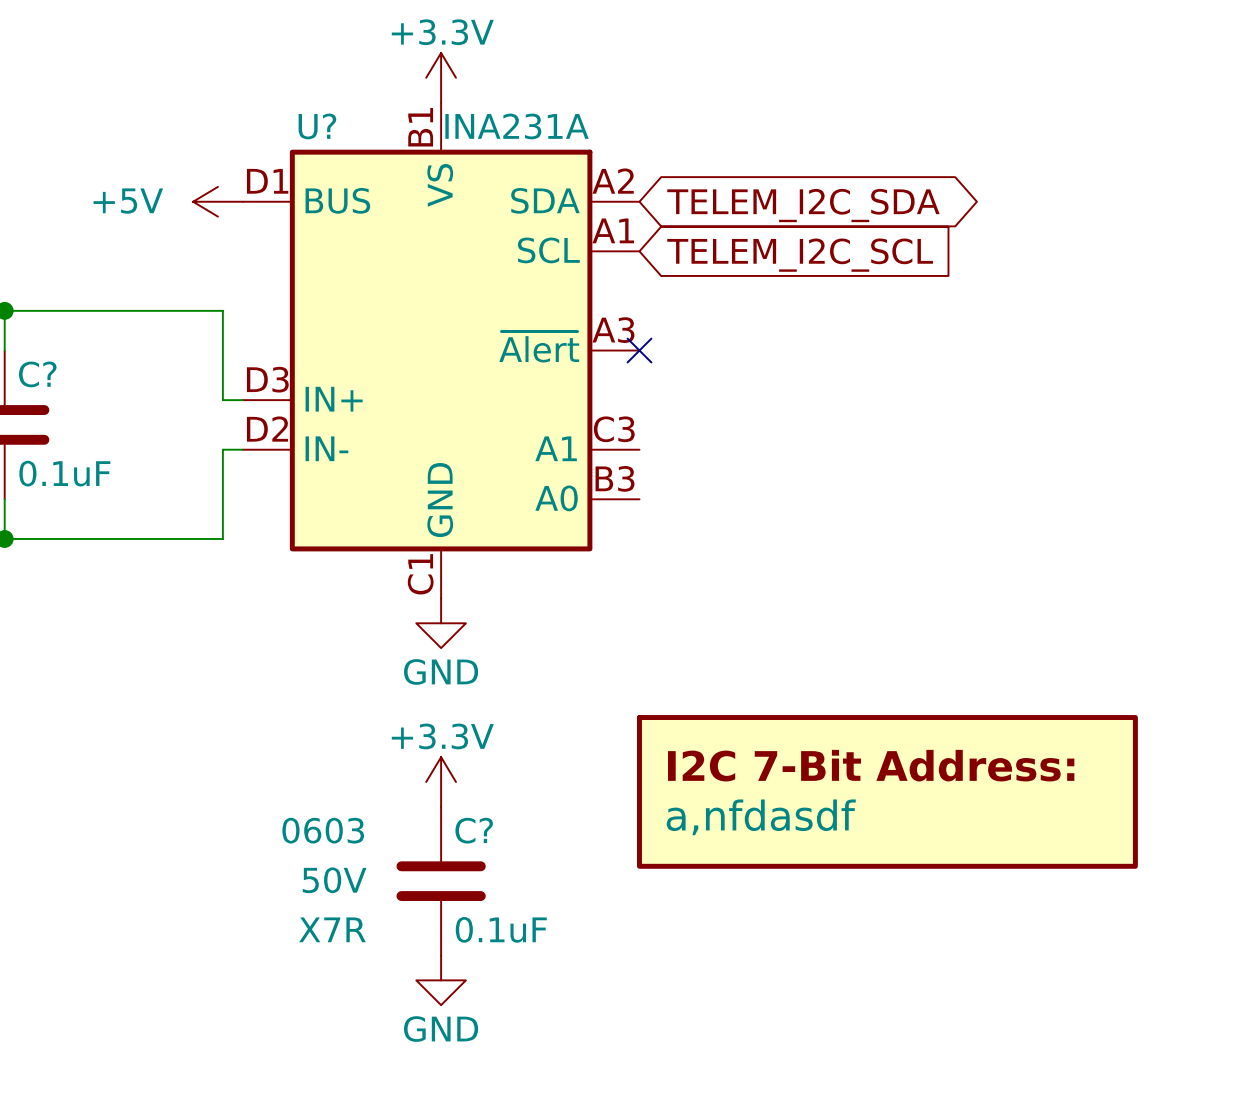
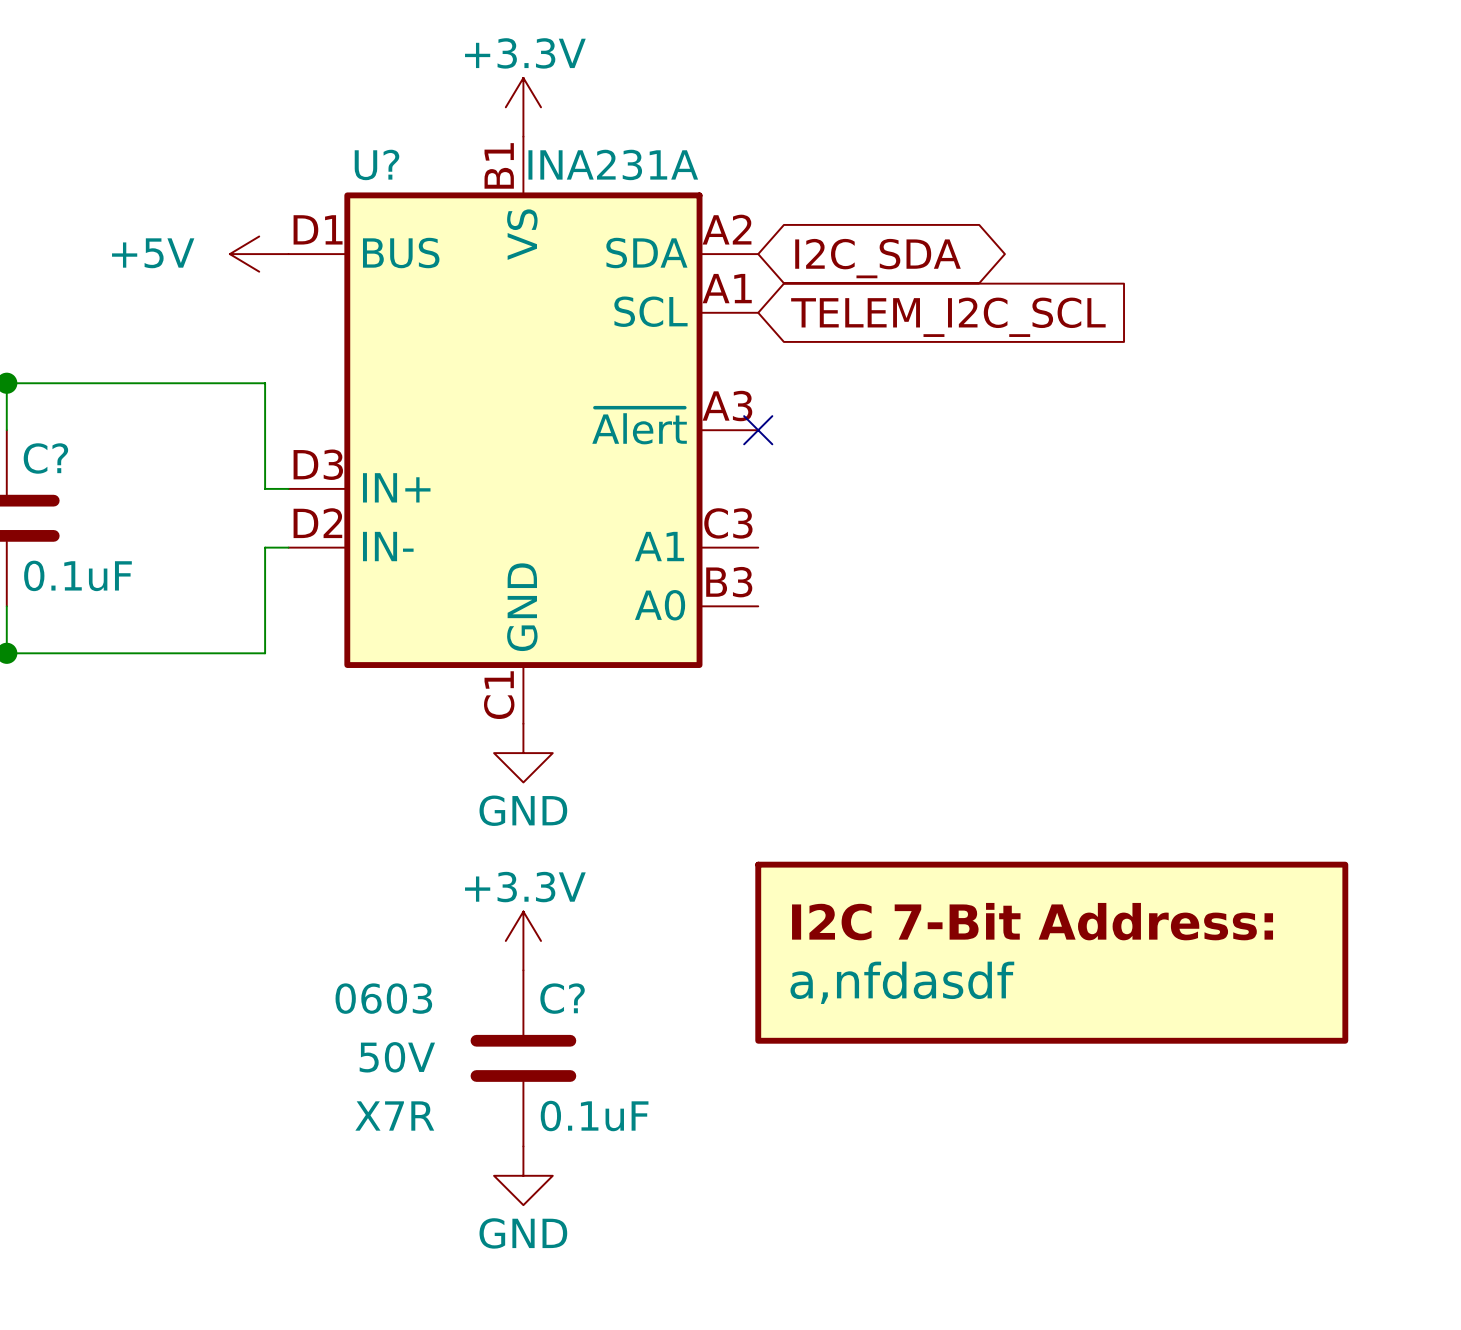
global label: TELEM_I2C_SDA (803, 205) -> I2C_SDA (877, 258)

